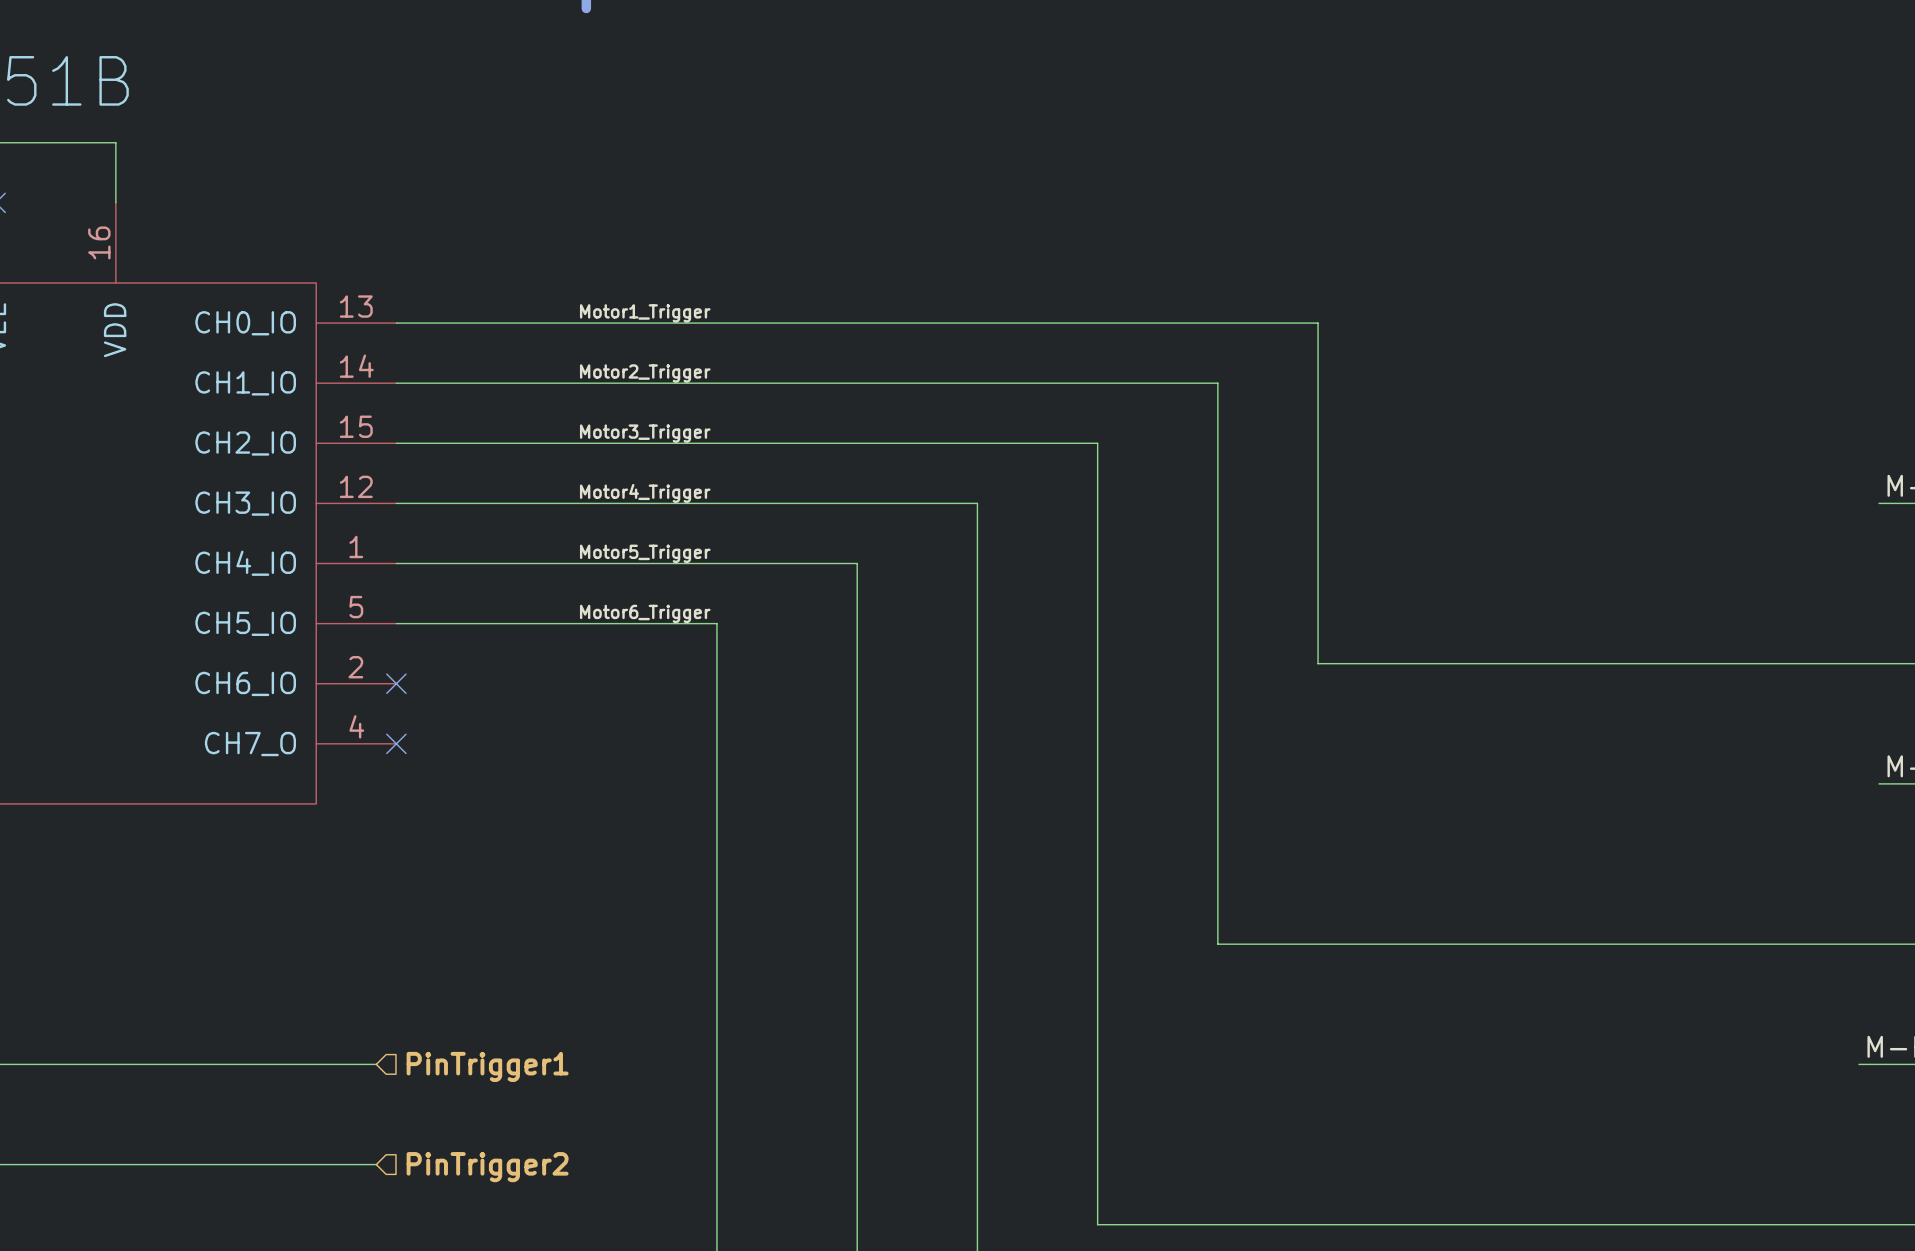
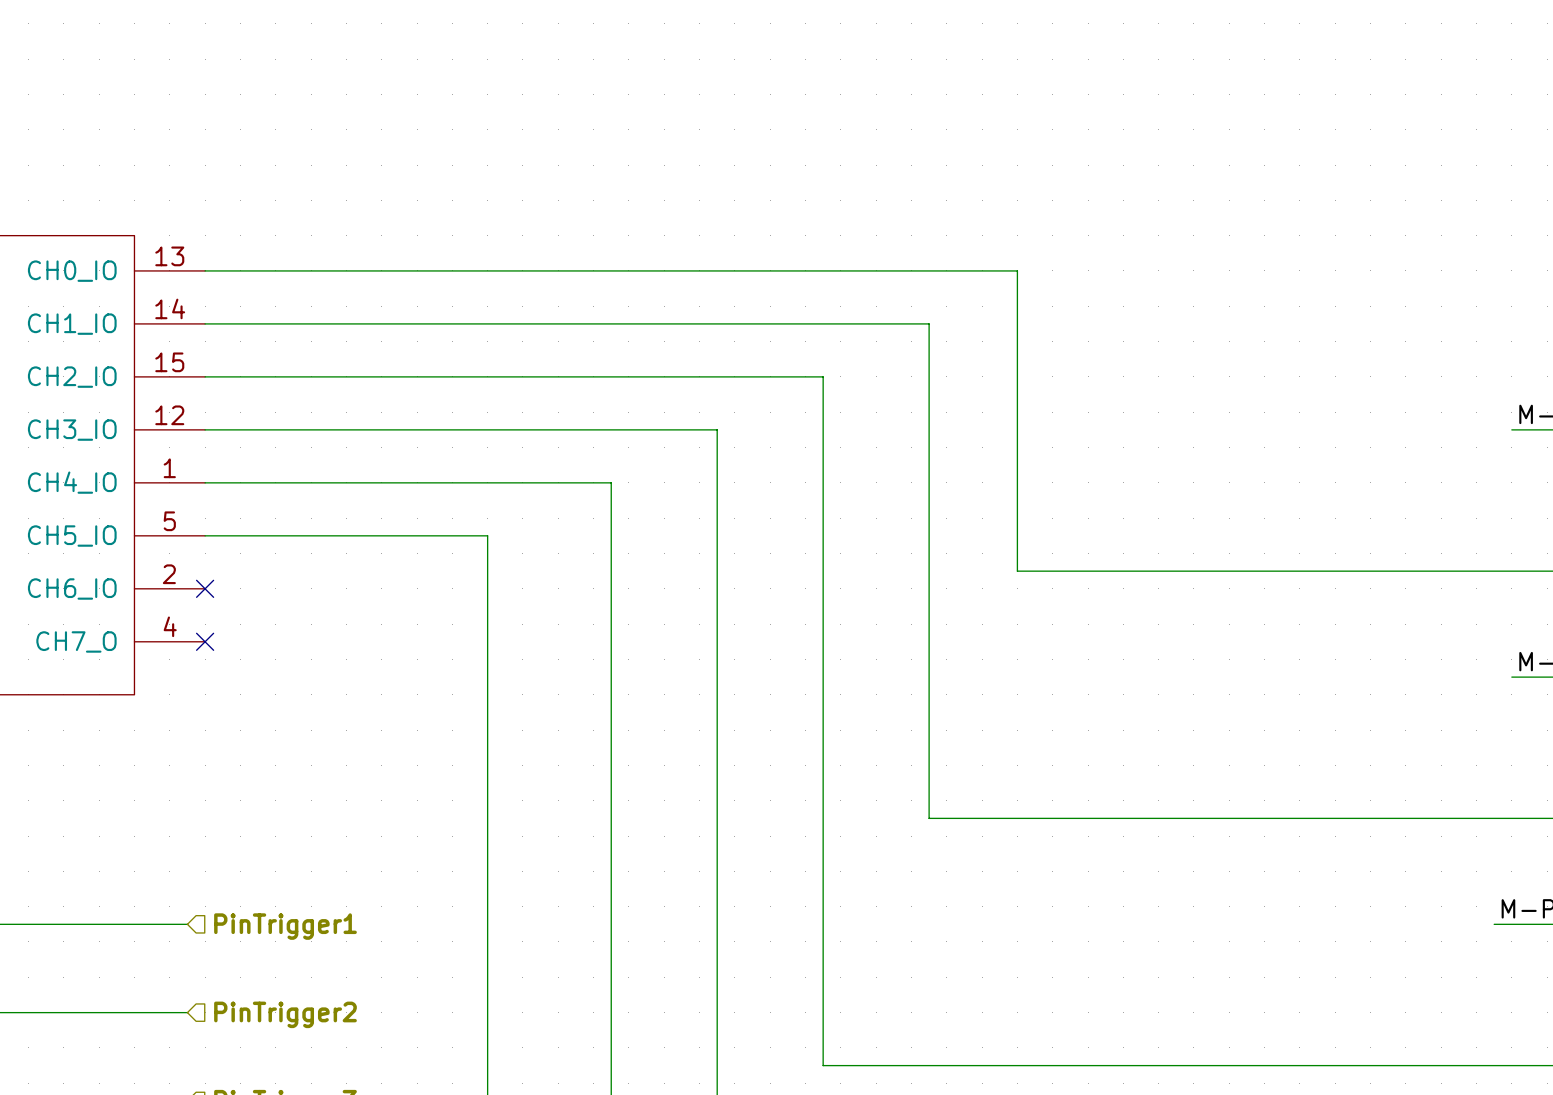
label: Motor1_Trigger (645, 313) -> none
label: Motor2_Trigger (645, 373) -> none
label: Motor3_Trigger (645, 433) -> none
label: Motor4_Trigger (645, 493) -> none
label: Motor5_Trigger (645, 553) -> none
label: Motor6_Trigger (645, 613) -> none

